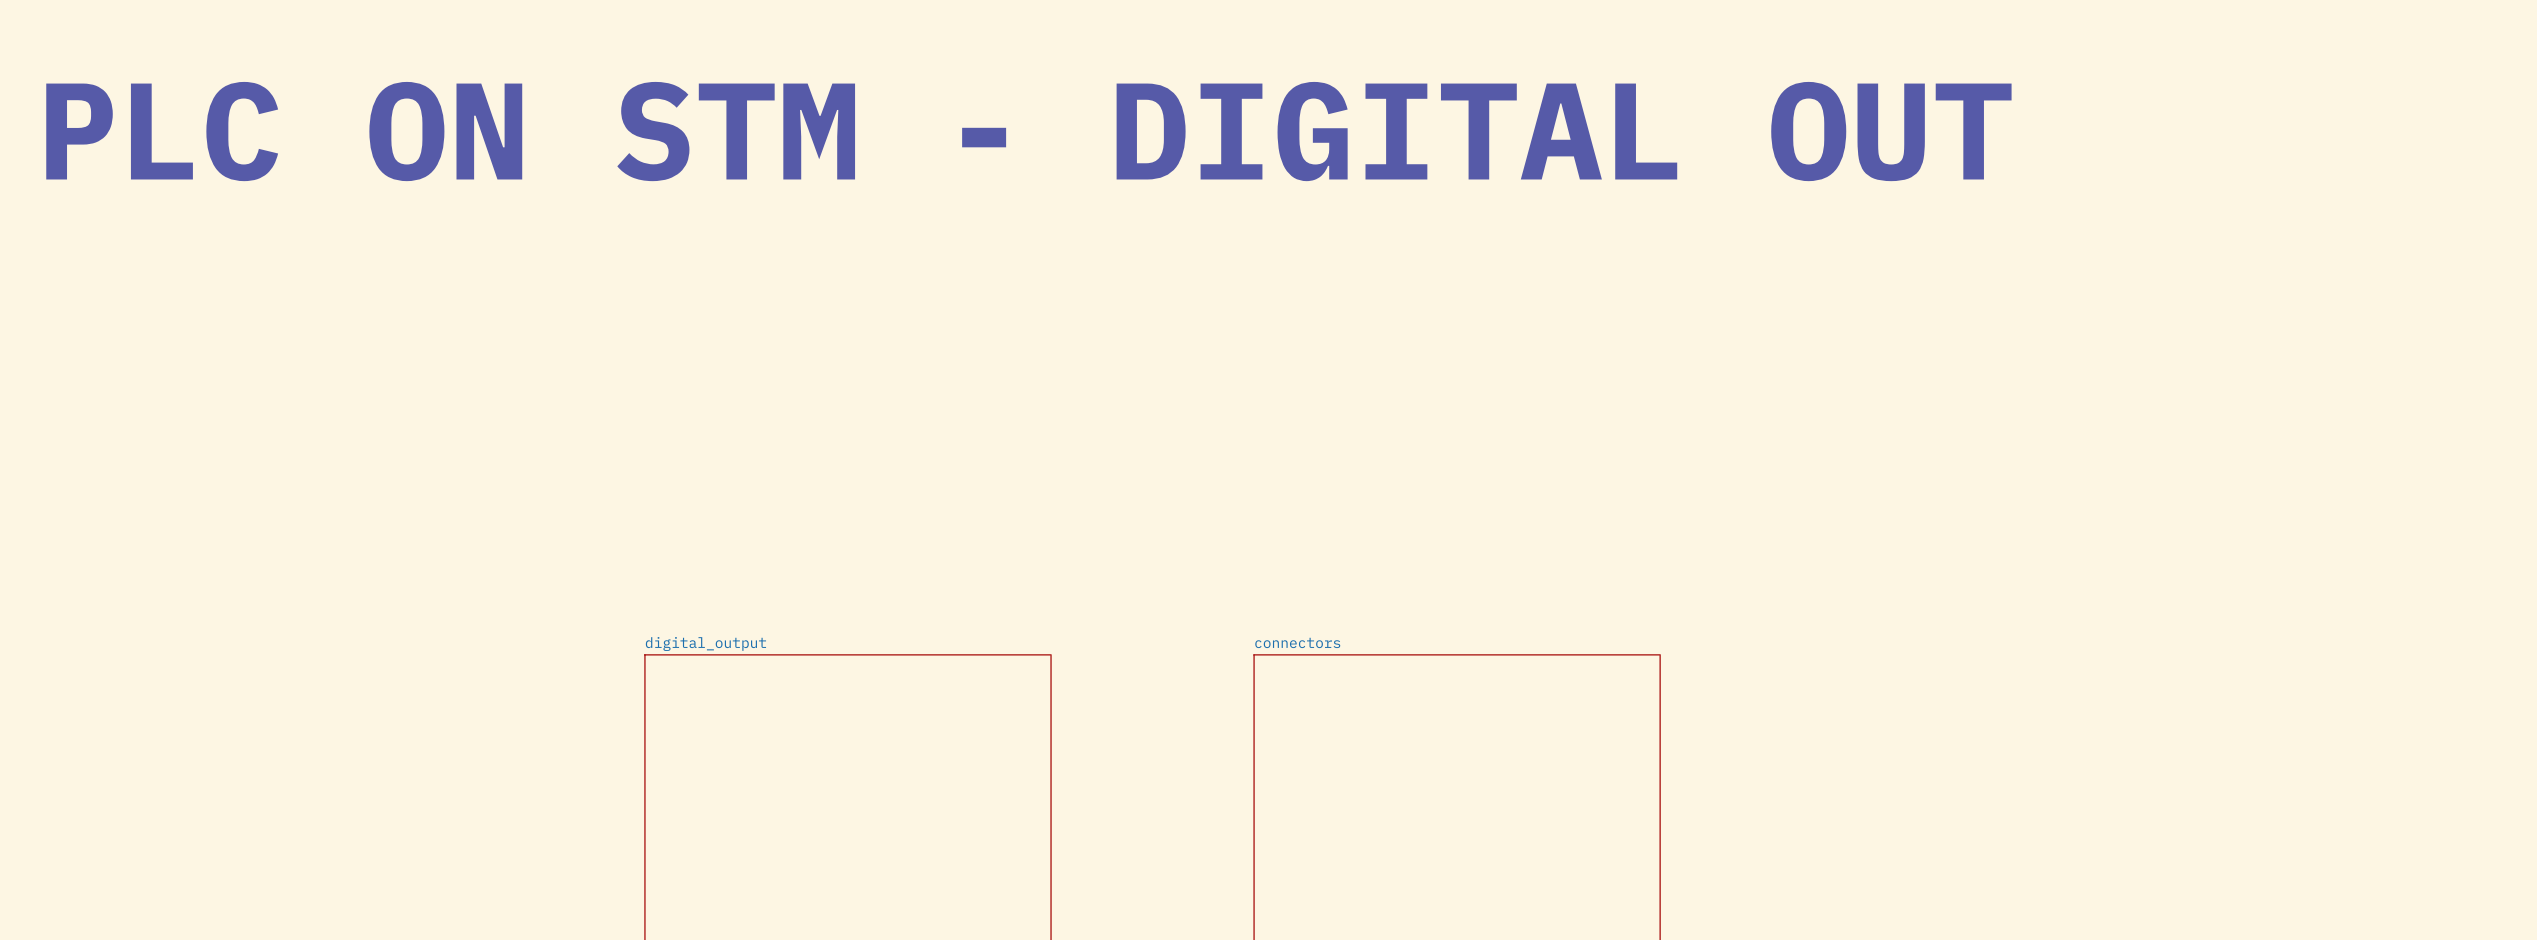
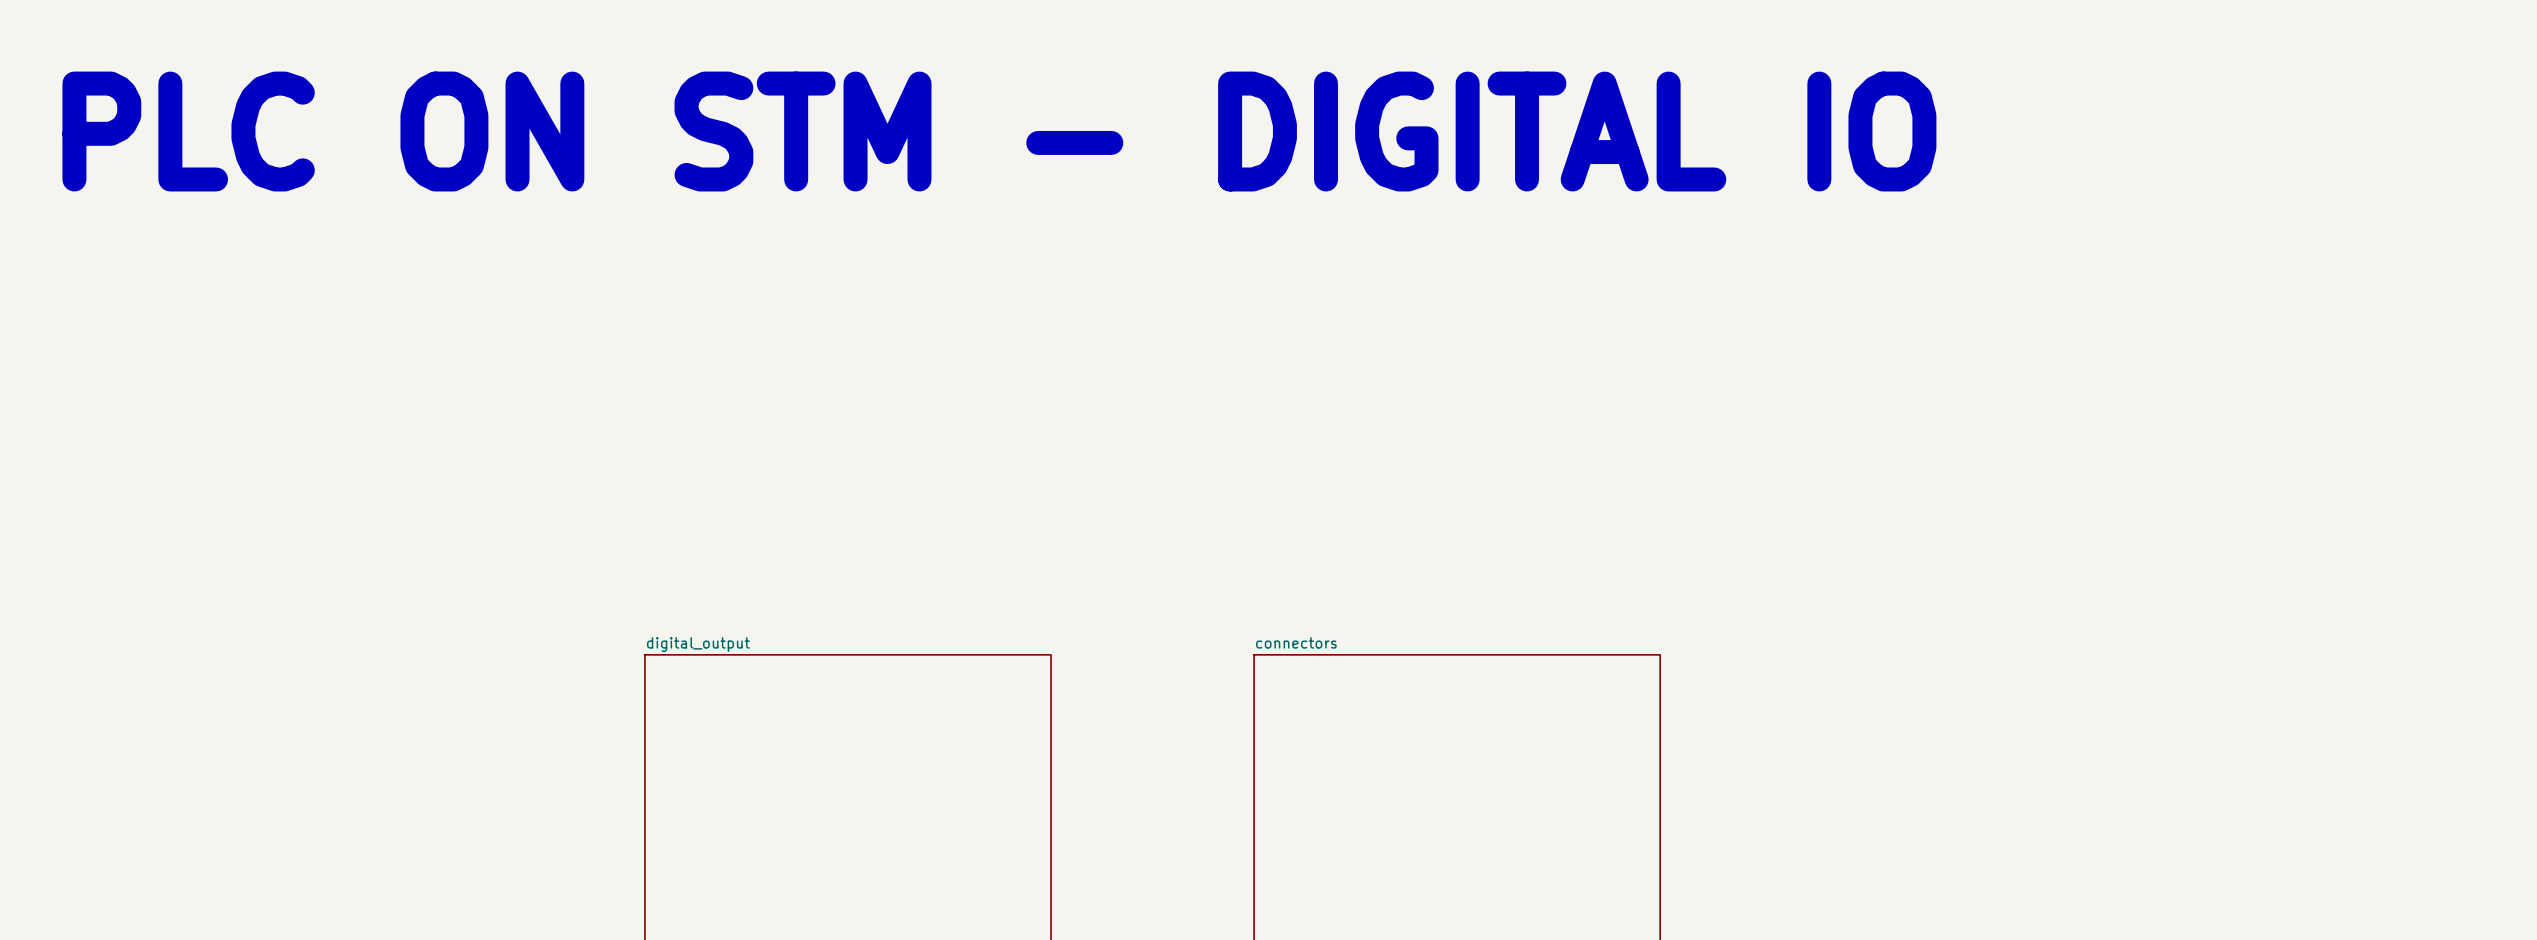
text: PLC ON STM - DIGITAL OUT (1028, 131) -> PLC ON STM - DIGITAL IO (999, 131)

